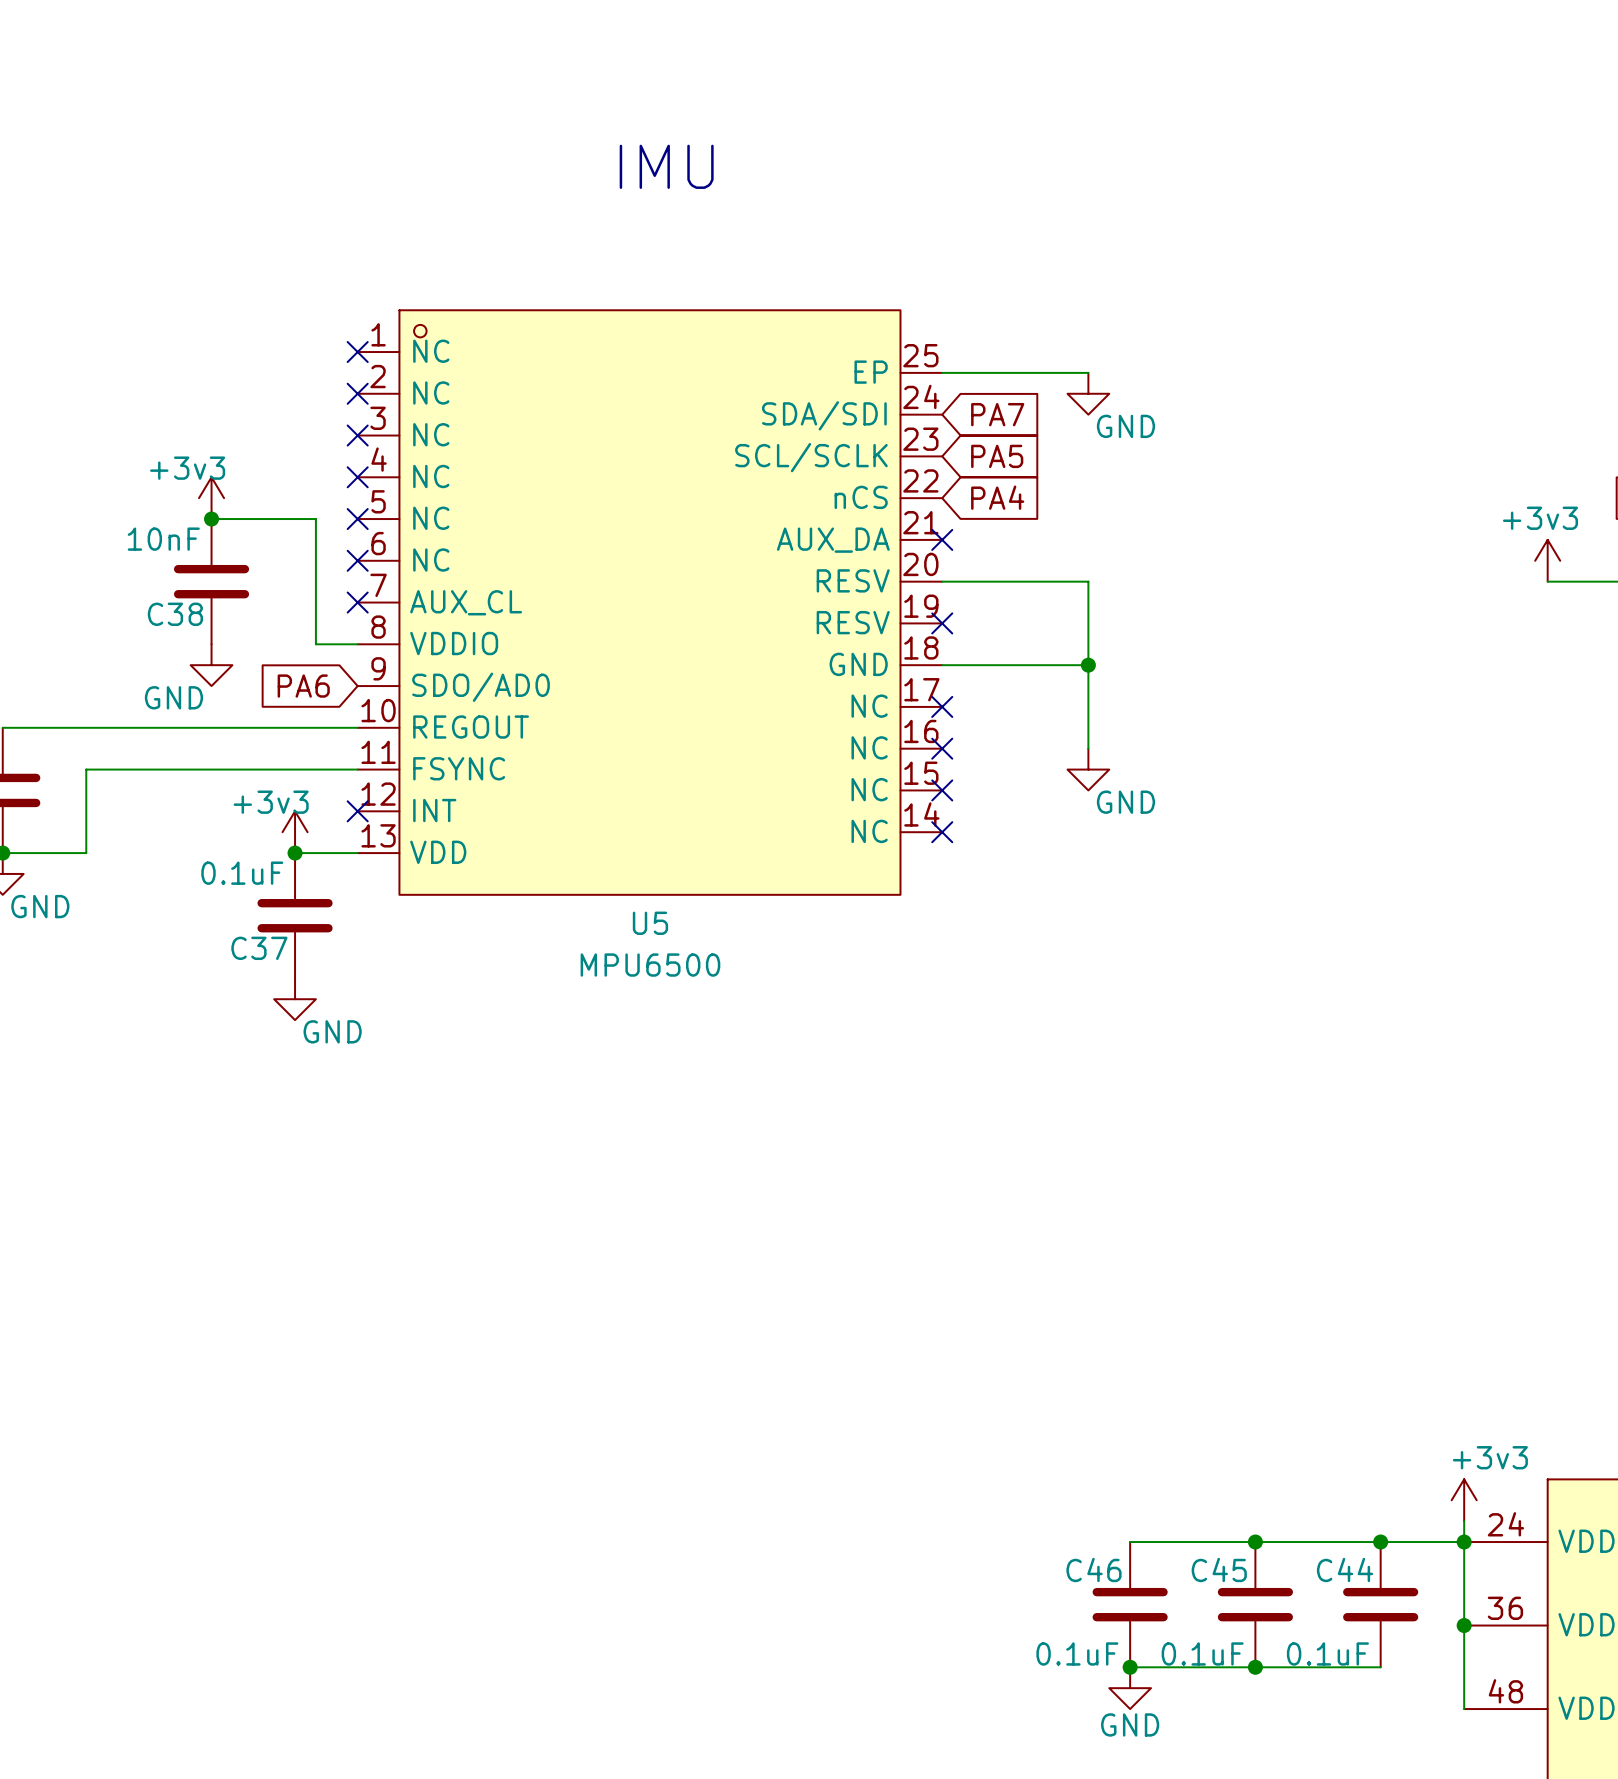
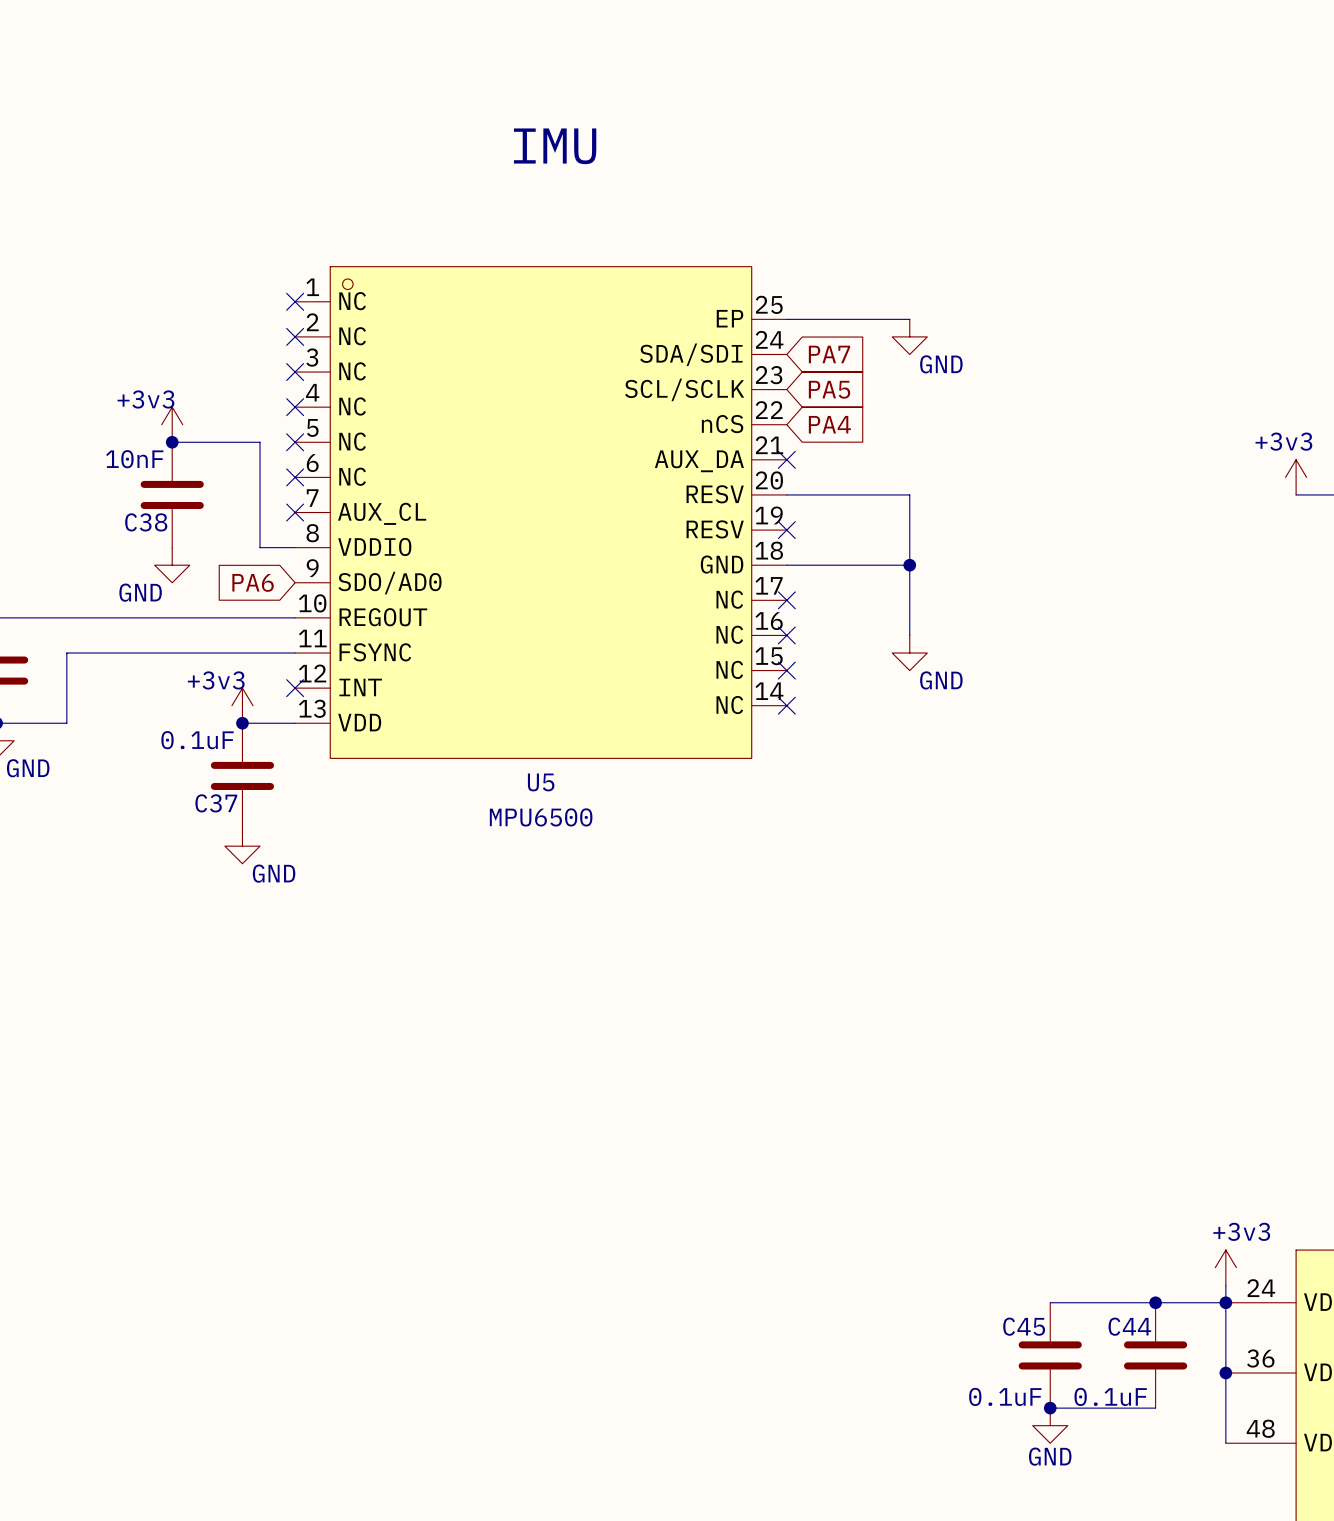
wire: (1130, 1542) (1255, 1542) -> none
junction: (1255, 1542) -> none
C46: 0.1uF (1130, 1604) -> none
wire: (1130, 1667) (1255, 1667) -> none
junction: (1130, 1667) -> none
power symbol position: GND (1130, 1688) -> GND (1050, 1425)

